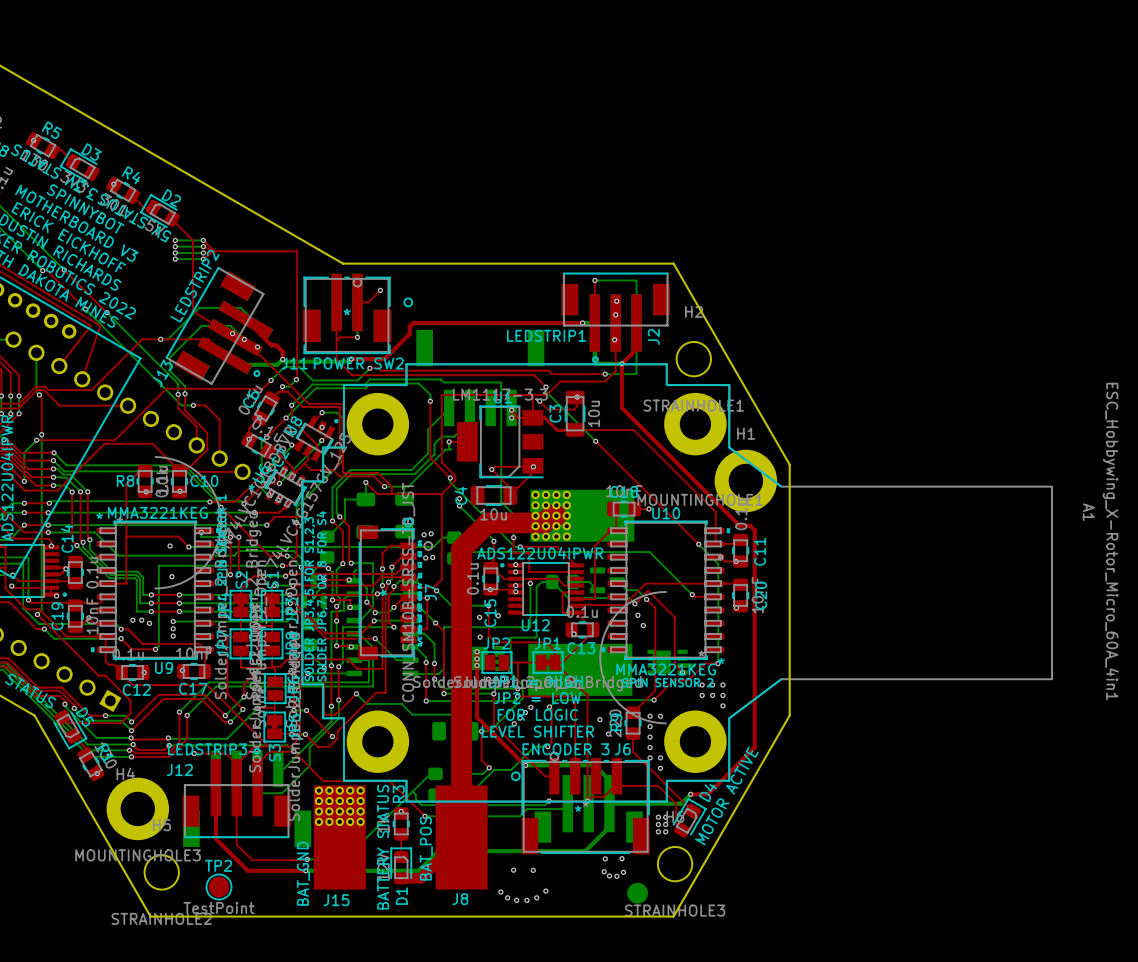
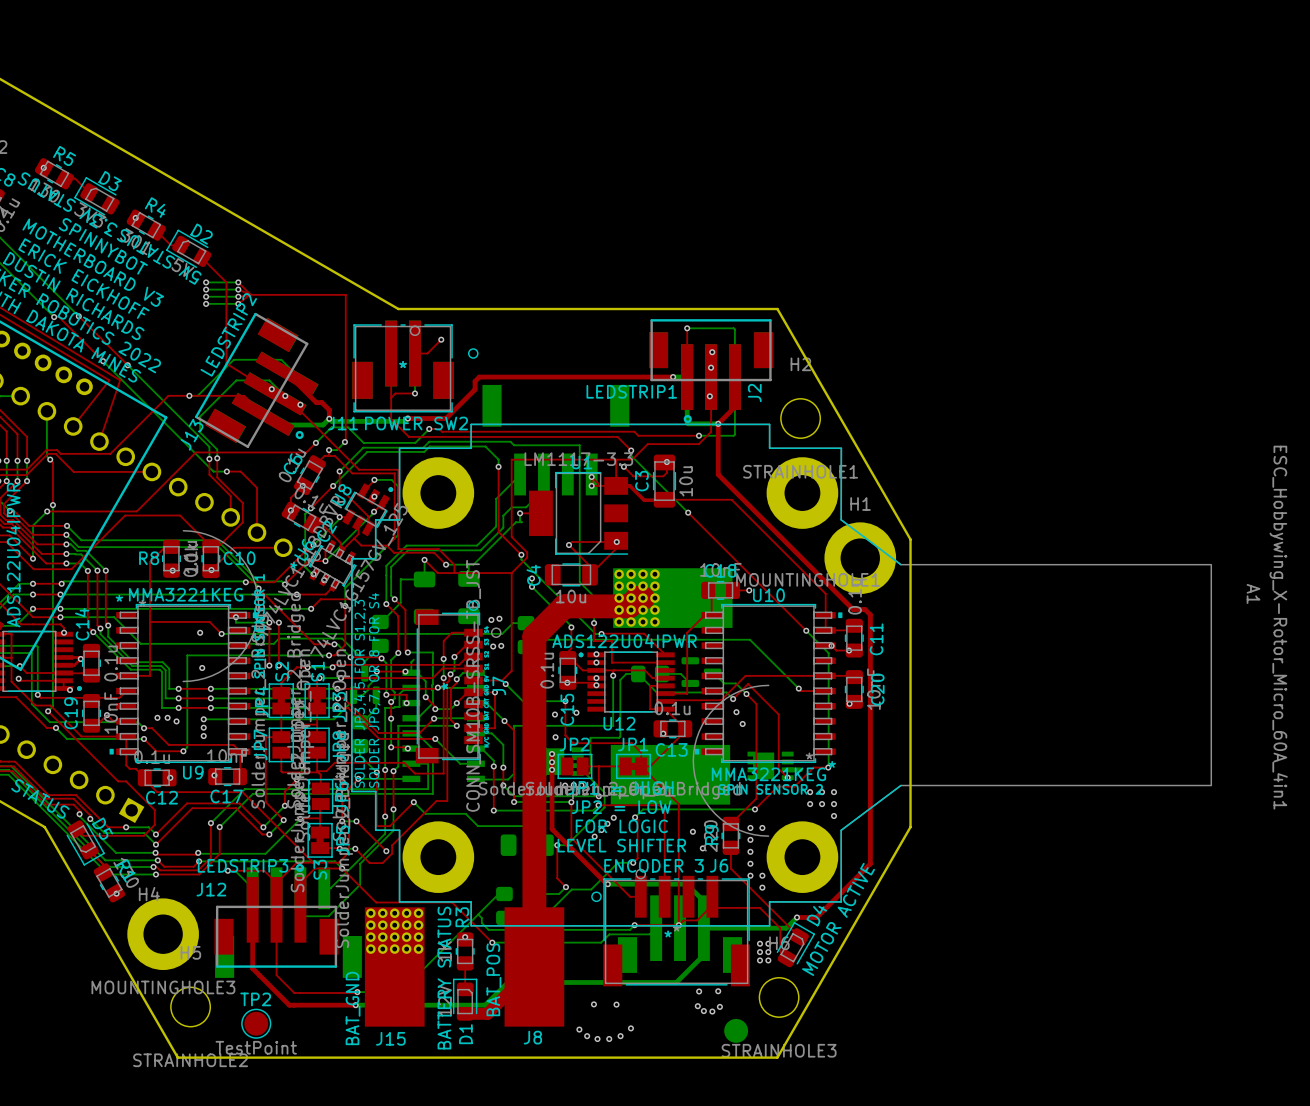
bottom track: none -> (227, 870) (235, 870) (252, 888)

